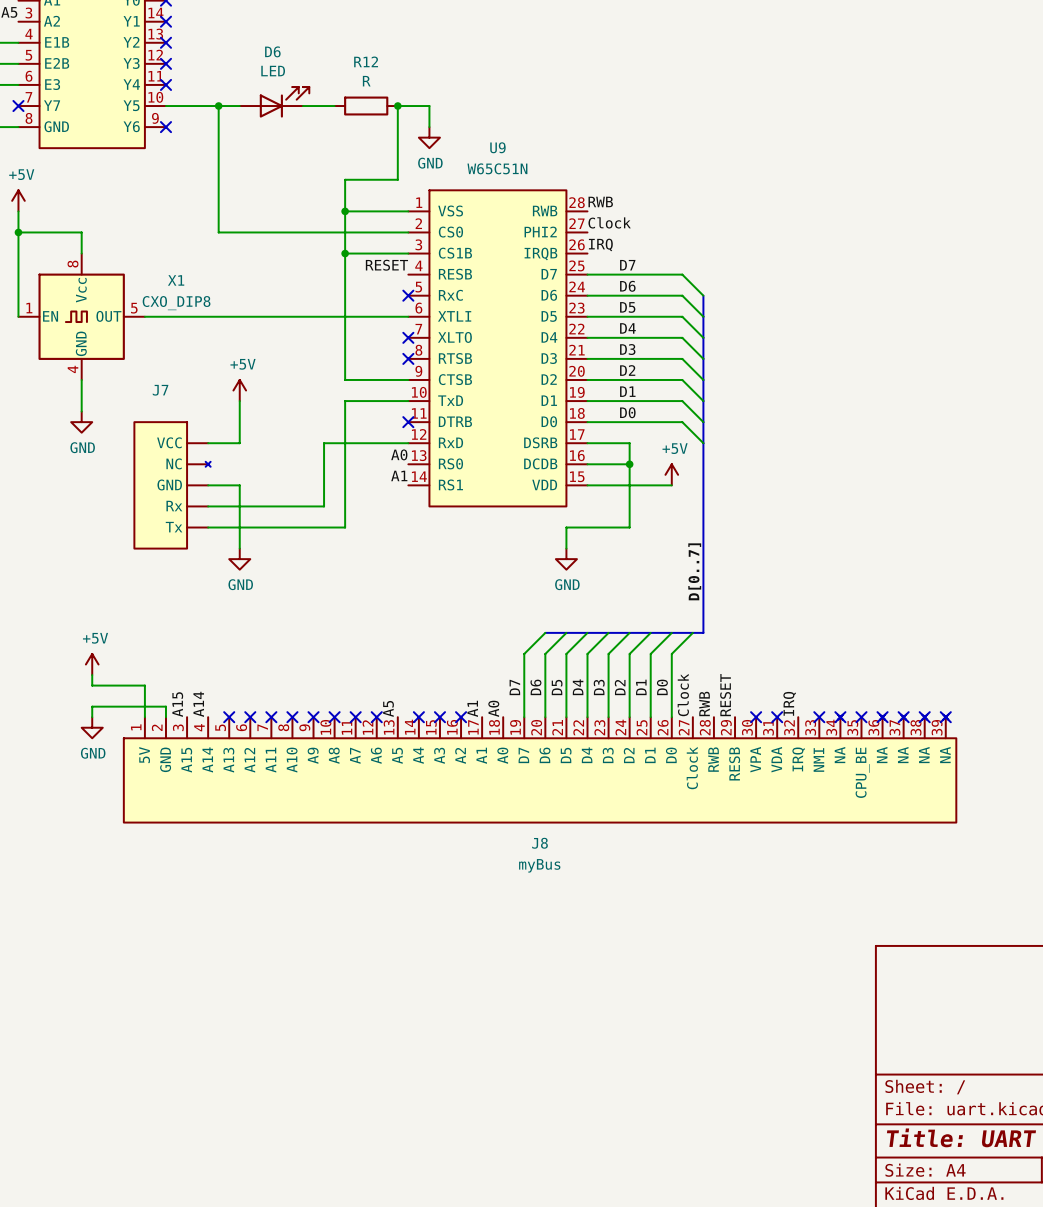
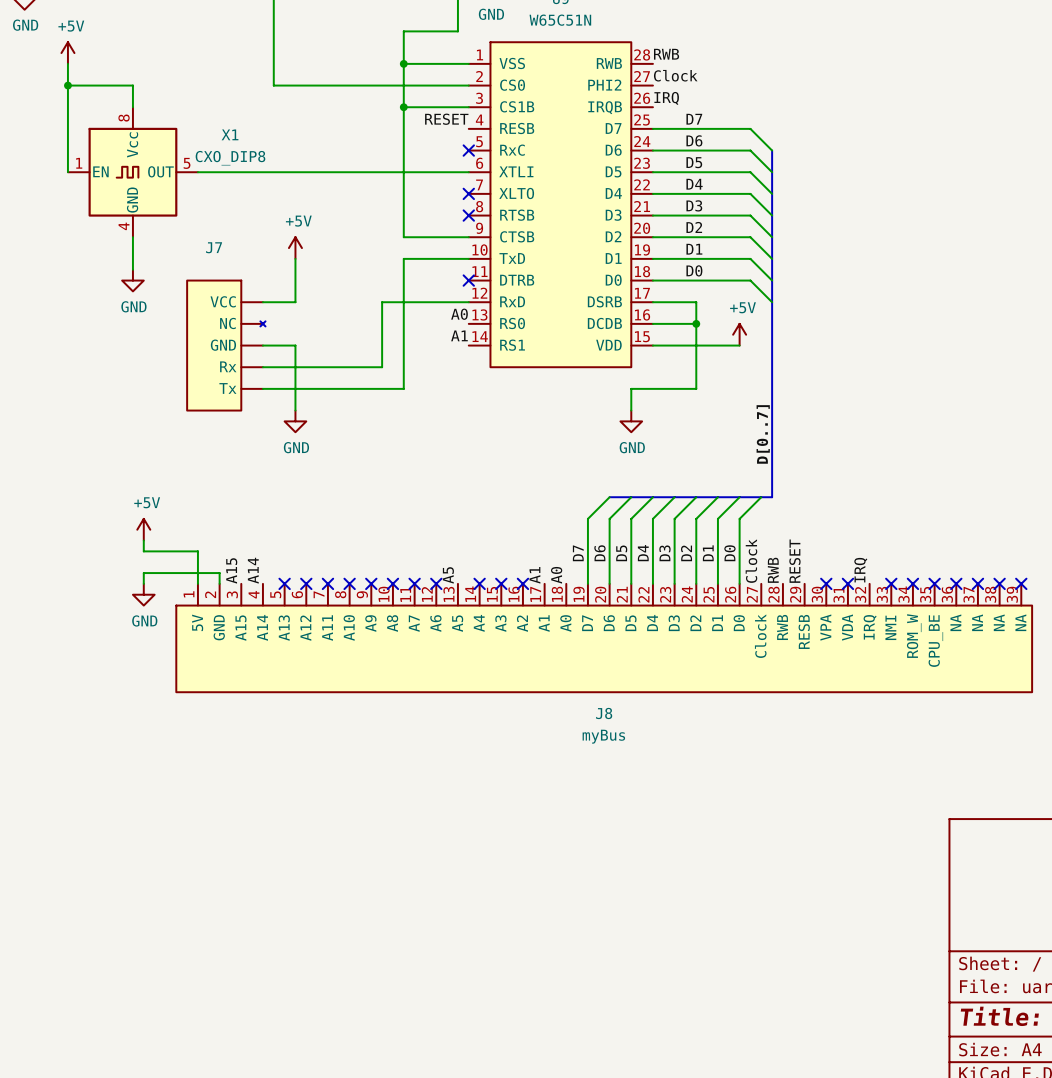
J8 symbol: [123, 714, 957, 823] -> [176, 583, 1033, 693]

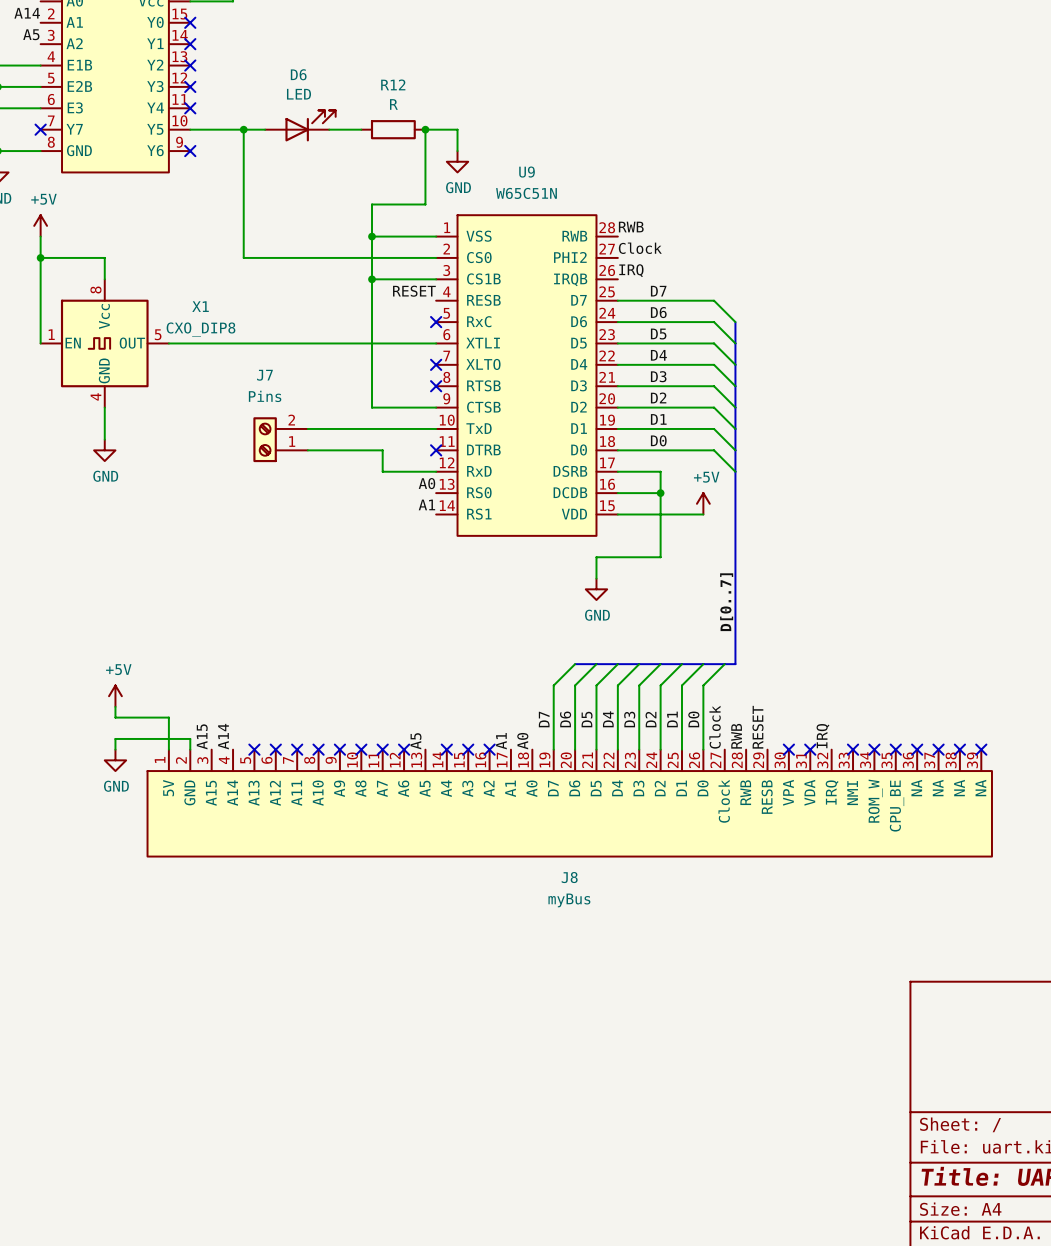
J7 value: none -> Pins (265, 396)
J7 name position: J7 (214, 247) -> J7 (264, 375)
power symbol: +5V (295, 248) -> none
wire: (295, 258) (295, 302) (262, 302) -> none
wire: (403, 258) (403, 388) (262, 388) -> (372, 428) (307, 428)
J7 symbol: [187, 280, 266, 411] -> [253, 417, 308, 463]
wire: (414, 302) (382, 302) (382, 367) (262, 367) -> (382, 471) (382, 450) (307, 450)
wire: (262, 345) (295, 345) (295, 410) -> none
power symbol: GND (295, 421) -> none

